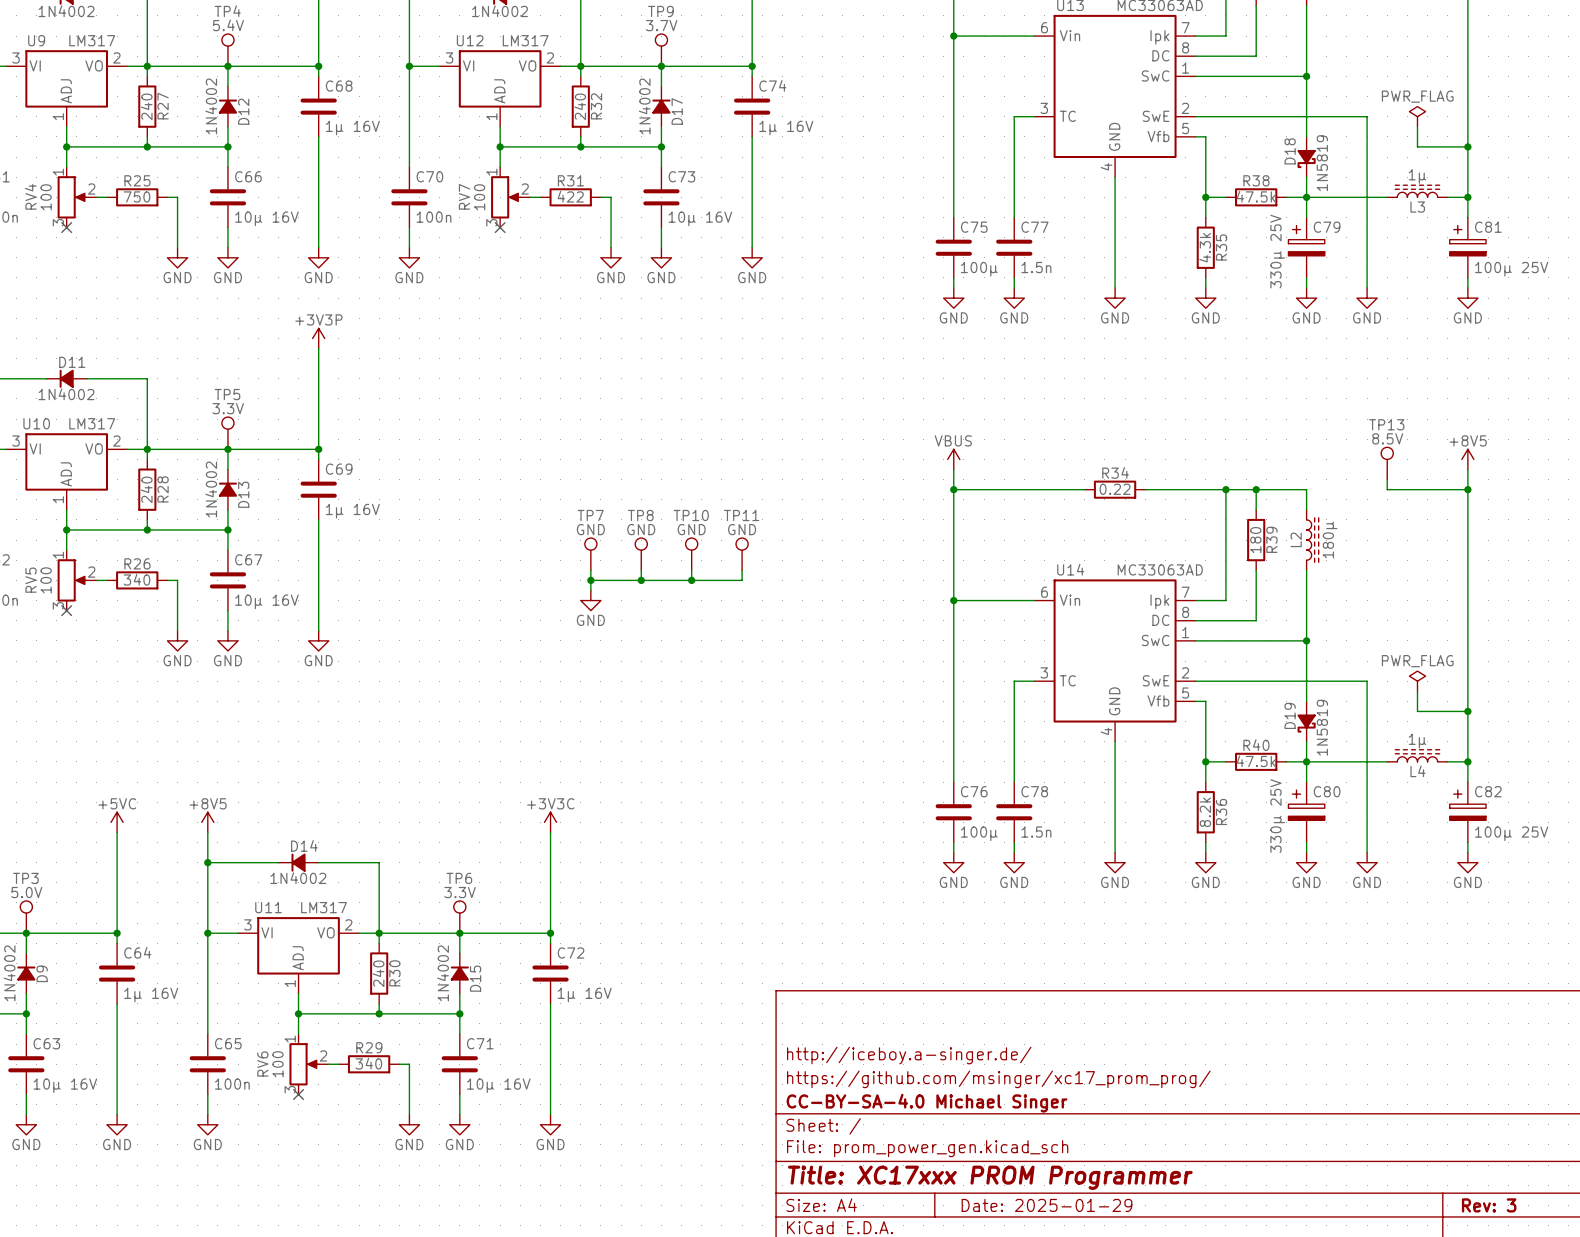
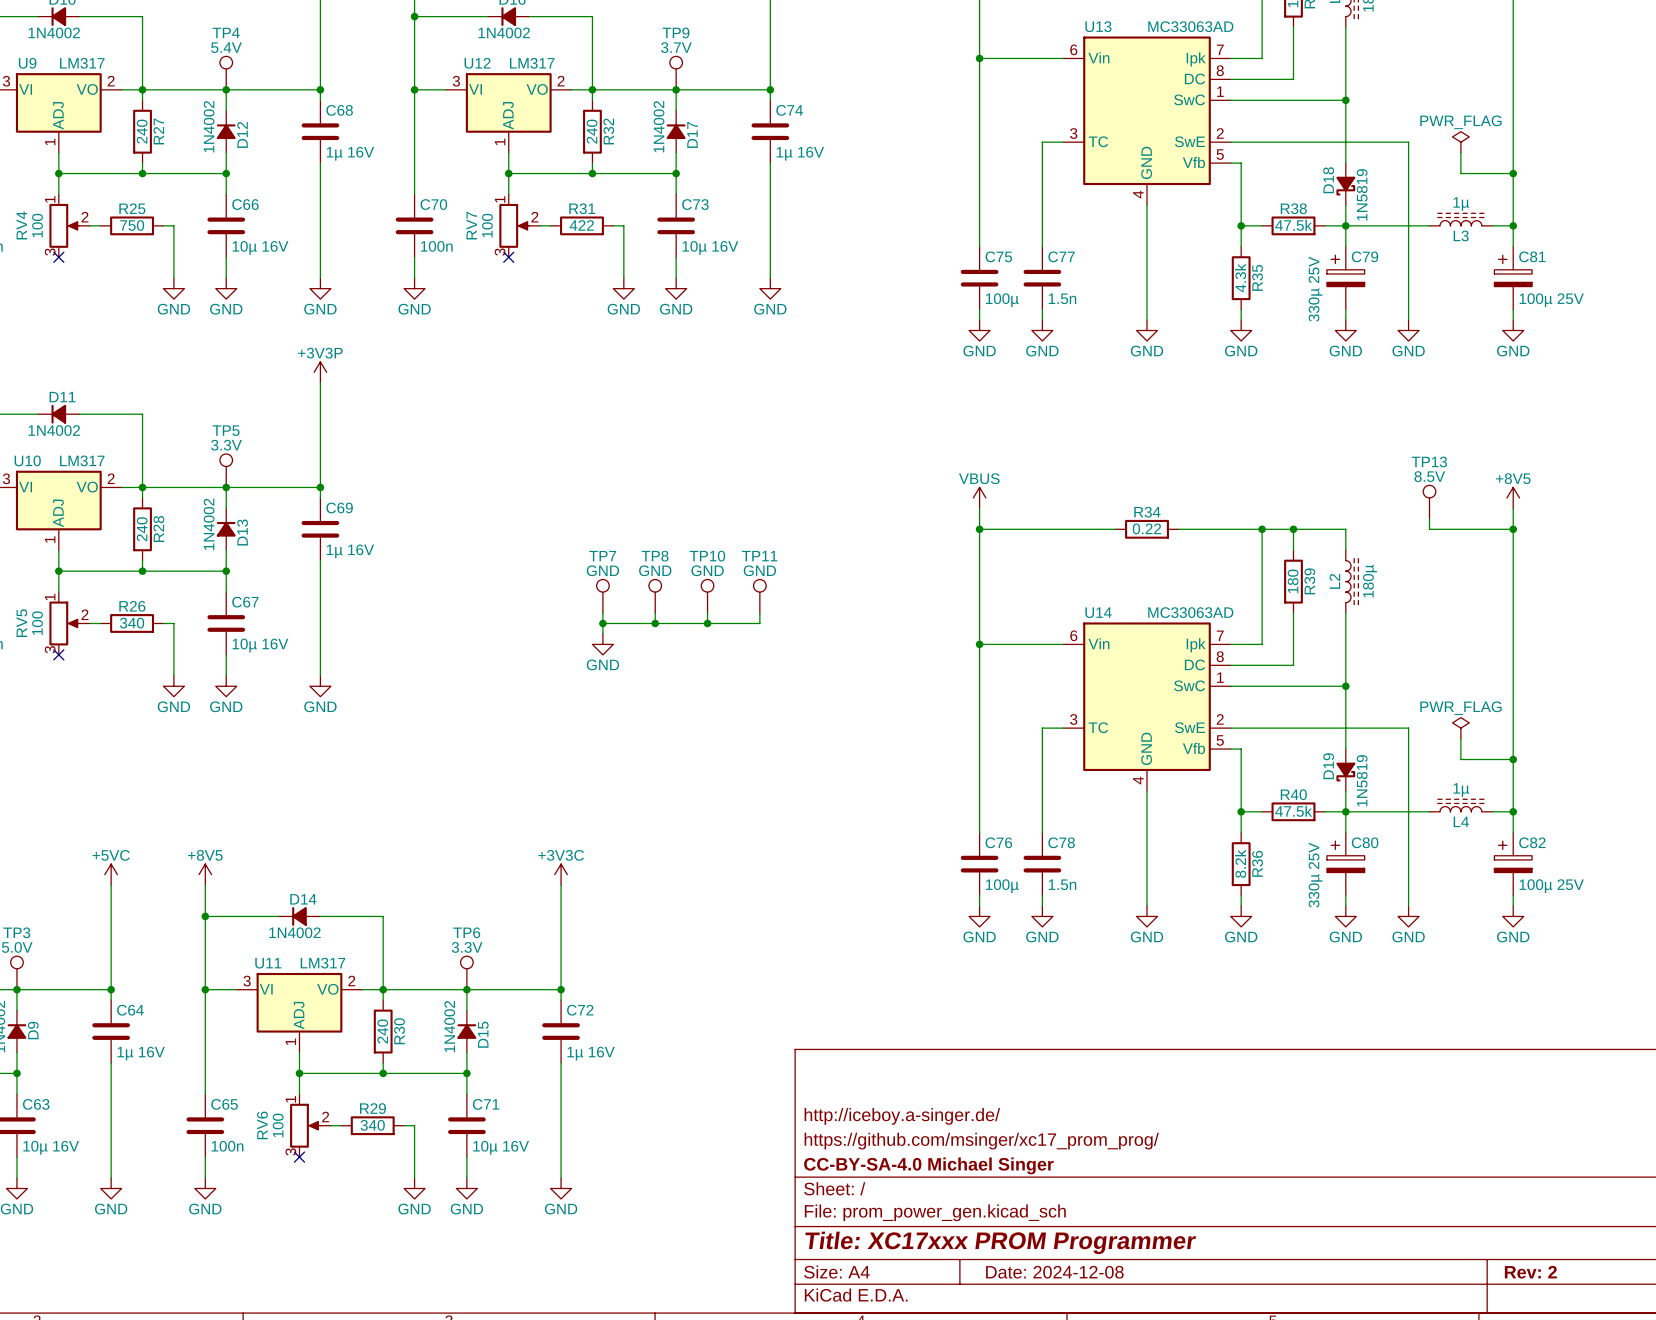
title block: Date: 2025-01-29 (1047, 1205) -> Date: 2024-12-08 (1054, 1272)
title block: Rev: 3 (1489, 1205) -> Rev: 2 (1530, 1272)

